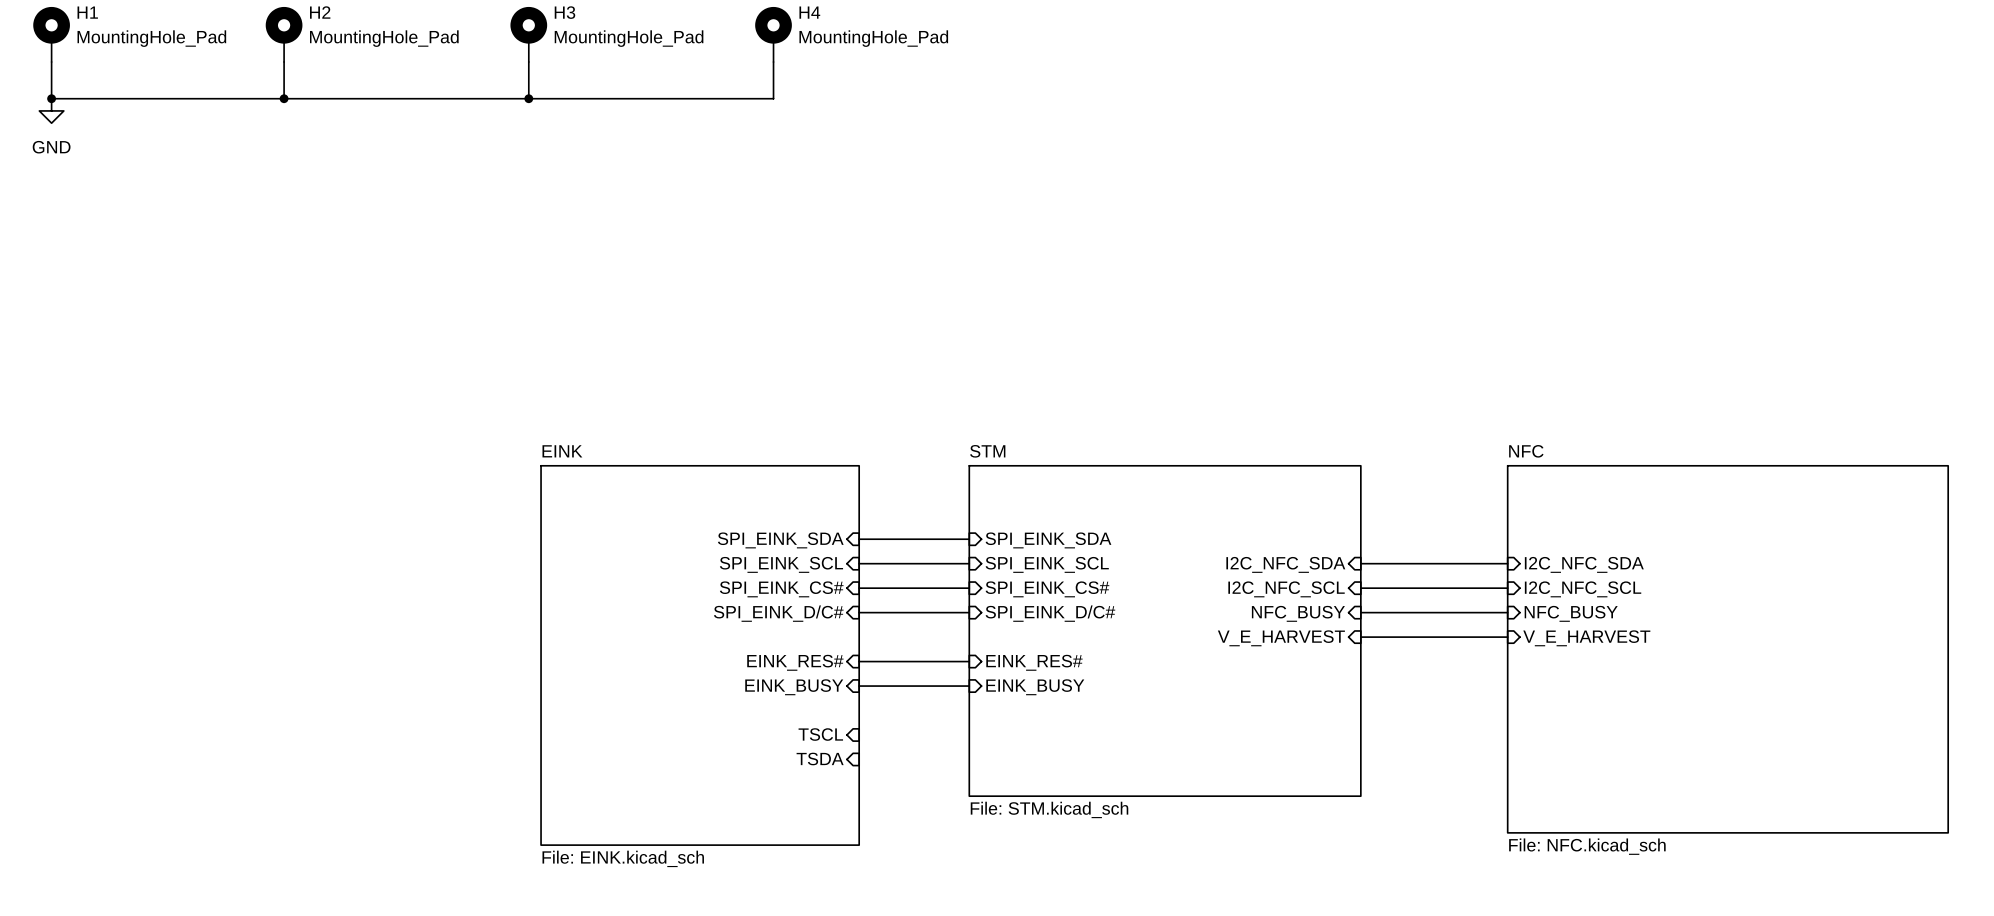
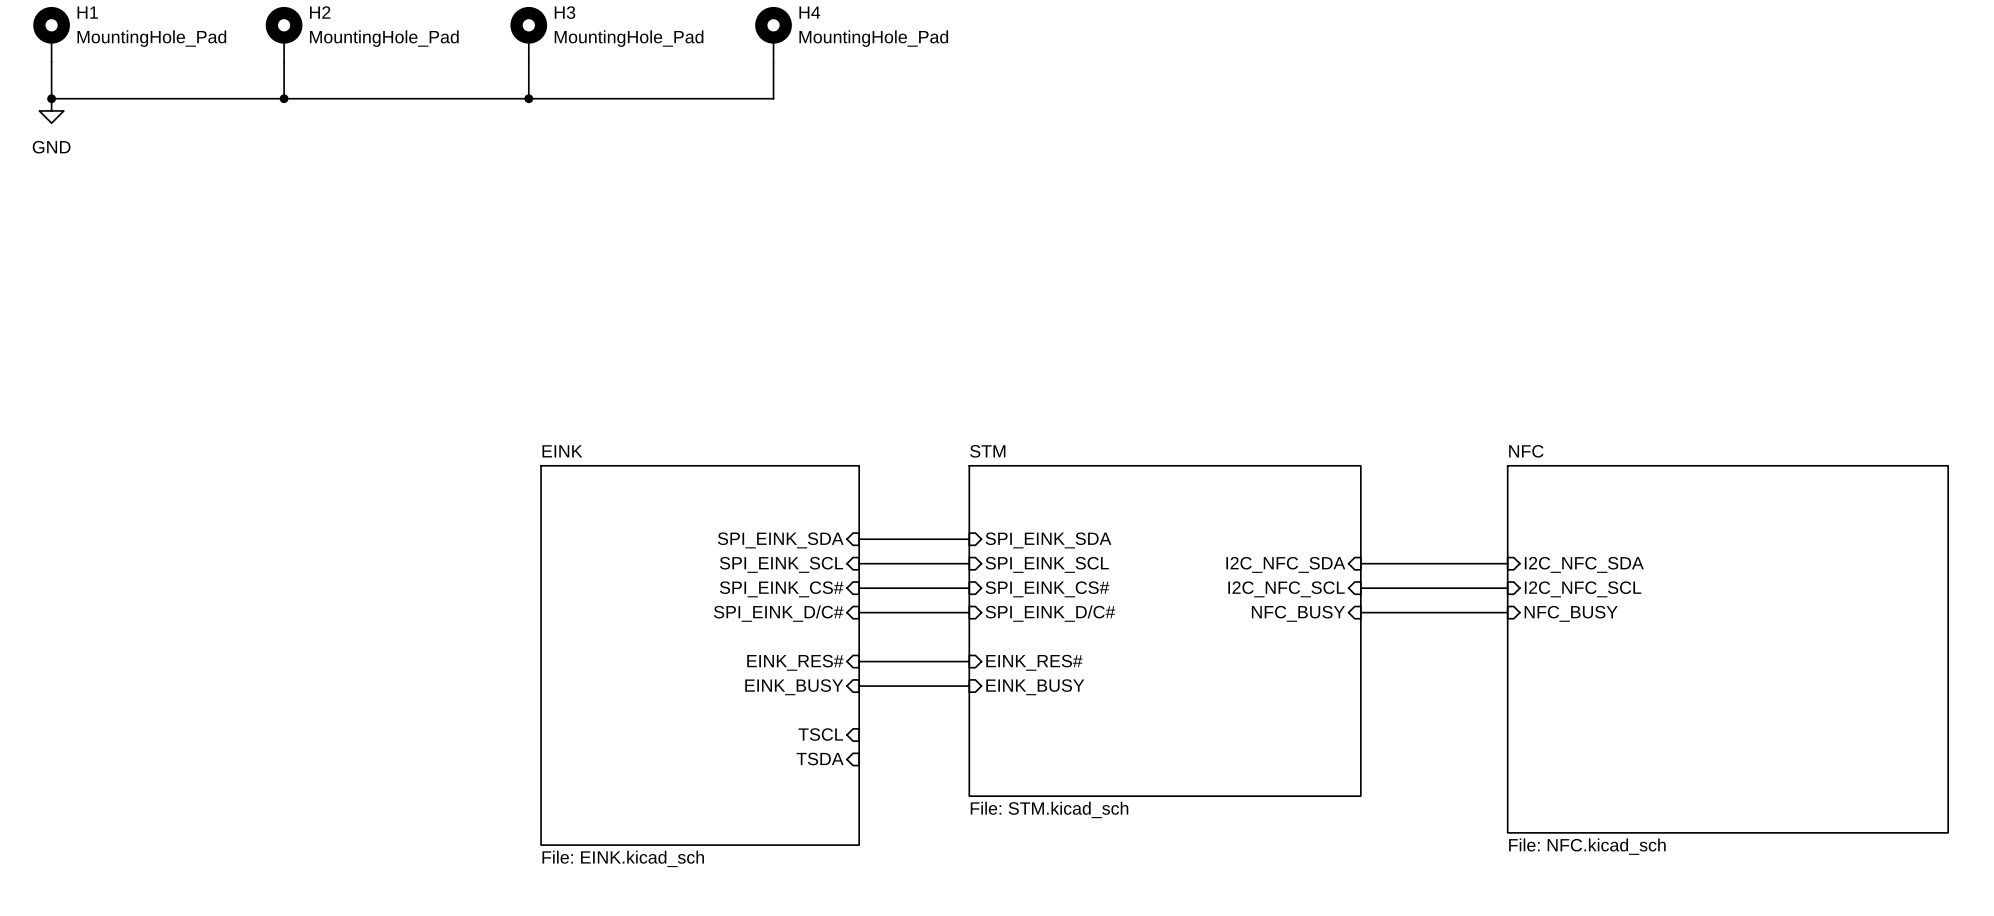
wire: (1360, 637) (1507, 637) -> none
sheet pin: V_E_HARVEST (1281, 638) -> none
sheet pin: V_E_HARVEST (1586, 638) -> none

